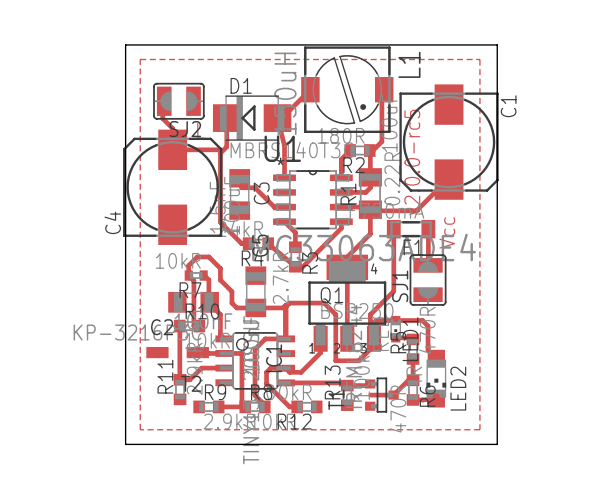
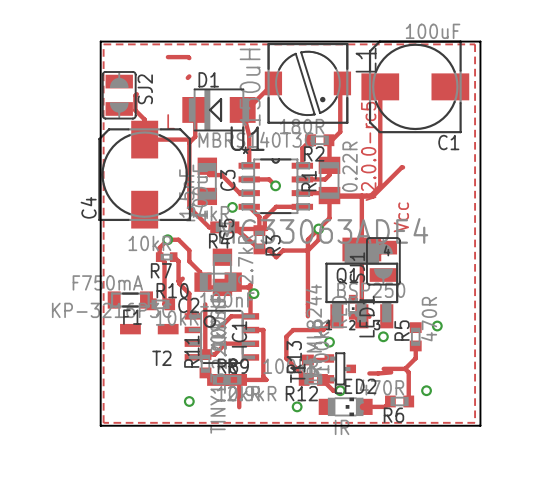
board edge: (497, 44) (497, 444) (125, 444) -> (448, 41) (480, 41) (480, 425) (100, 425) (100, 414)
zone outline: (140, 59) (140, 429) (479, 429) (479, 59) (140, 59) -> (103, 44) (103, 422) (475, 422) (475, 44) (103, 44)
track: none -> (167, 57) (189, 58)
track: none -> (189, 76) (187, 77)
track: none -> (380, 86) (380, 185) (371, 195) (329, 195)
SJ2 rotation: 0° (178, 101) -> 90° counterclockwise (119, 95)
SJ2 position: (178, 101) -> (119, 95)
C1 rotation: 0° (449, 142) -> 90° clockwise (415, 86)
track: none -> (249, 179) (269, 179) (275, 185)
via: none -> (275, 185)
track: none -> (361, 195) (361, 316)
track: (341, 221) (341, 228) (301, 268) -> (318, 228) (318, 239) (307, 250) (283, 250) (276, 257) (269, 250) (264, 250)
track: none -> (302, 206) (276, 206) (264, 218) (266, 228) (230, 228)
via: none -> (232, 207)
track: (393, 229) (393, 291) (370, 314) (370, 335) (373, 338) (370, 342) (370, 349) (358, 360) (335, 360) (335, 314) (324, 303) (289, 303) (285, 306) -> none
F1 position: (411, 229) -> (130, 300)
track: (428, 229) (428, 265) -> none
via: none -> (318, 228)
via: none -> (167, 239)
C2 position: (193, 302) -> (218, 282)
Q1 position: (347, 303) -> (361, 282)
via: none -> (254, 293)
track: (179, 326) (180, 379) (189, 379) (201, 368) (224, 368) -> (205, 304) (205, 354) (214, 354) (225, 343) (247, 343)
track: (370, 326) (376, 320) (422, 320) (428, 326) (428, 350) (436, 358) -> none
track: (320, 338) (320, 352) (301, 372) (289, 372) (285, 368) (270, 368) (266, 372) (266, 383) (289, 406) -> (239, 407) (239, 382) (241, 379) (254, 379)
track: none -> (336, 316) (323, 330) (293, 330) (286, 336) (286, 358) (307, 379) (304, 379)
track: (255, 349) (255, 395) (264, 406) -> none
R5 position: (413, 349) -> (415, 336)
via: none -> (437, 326)
track: (197, 352) (241, 353) (241, 403) (245, 406) (218, 406) -> none
track: none -> (247, 329) (263, 329) (263, 376) (266, 379) (261, 379)
track: (413, 359) (413, 380) (408, 380) (393, 395) (370, 395) -> none
via: none -> (383, 336)
via: none -> (329, 342)
track: none -> (415, 345) (415, 358) (405, 368)
LED2 rotation: 0° (436, 378) -> 90° counterclockwise (345, 406)
LED2 position: (436, 378) -> (345, 406)
track: (285, 382) (343, 382) -> none
R11 position: (180, 389) -> (205, 363)
R6 rotation: 0° (413, 390) -> 90° clockwise (399, 401)
R6 position: (413, 390) -> (399, 401)
track: none -> (383, 368) (405, 368)
track: none -> (405, 368) (408, 372) (408, 401)
R9 position: (208, 406) -> (232, 379)
R12 position: (306, 406) -> (313, 379)
track: none -> (322, 379) (333, 390) (340, 390)
via: none -> (340, 390)
via: none -> (426, 390)
via: none -> (189, 401)
track: none -> (390, 401) (385, 406) (364, 406)
via: none -> (297, 406)

